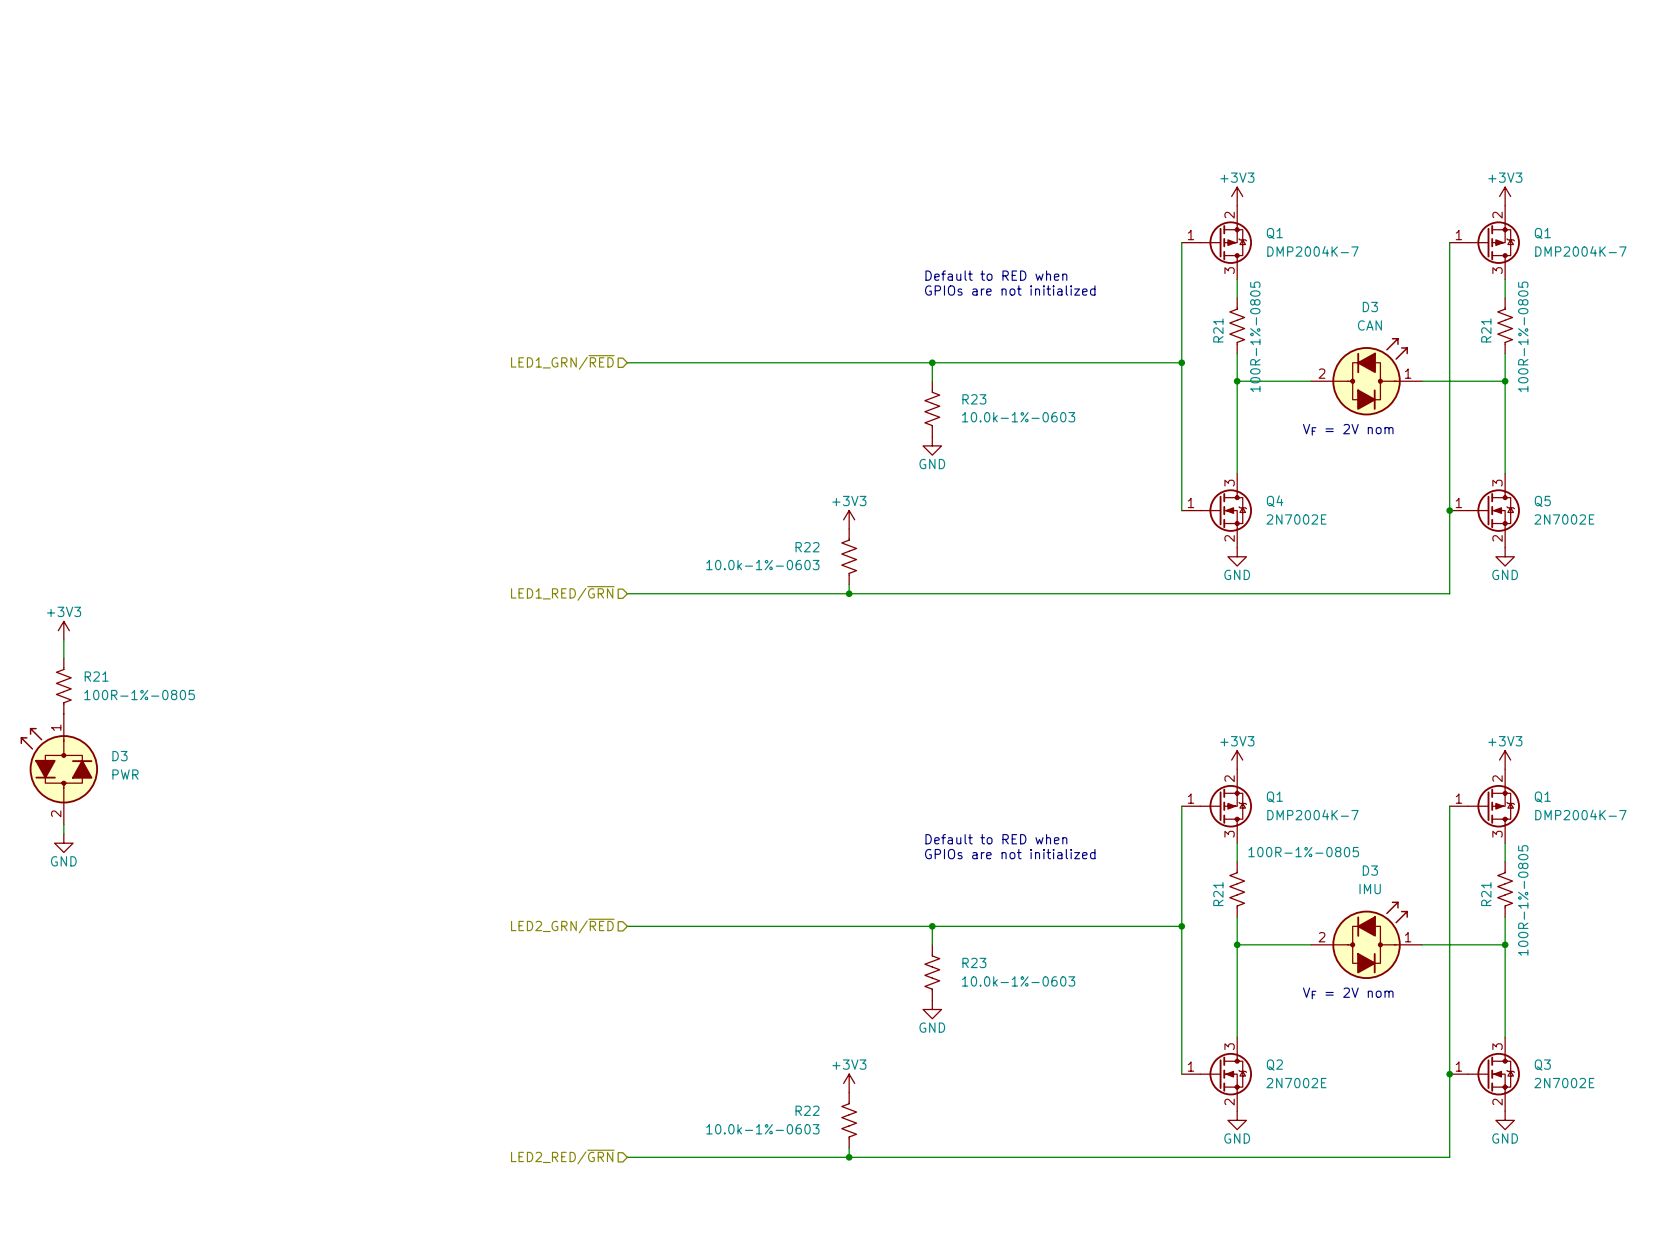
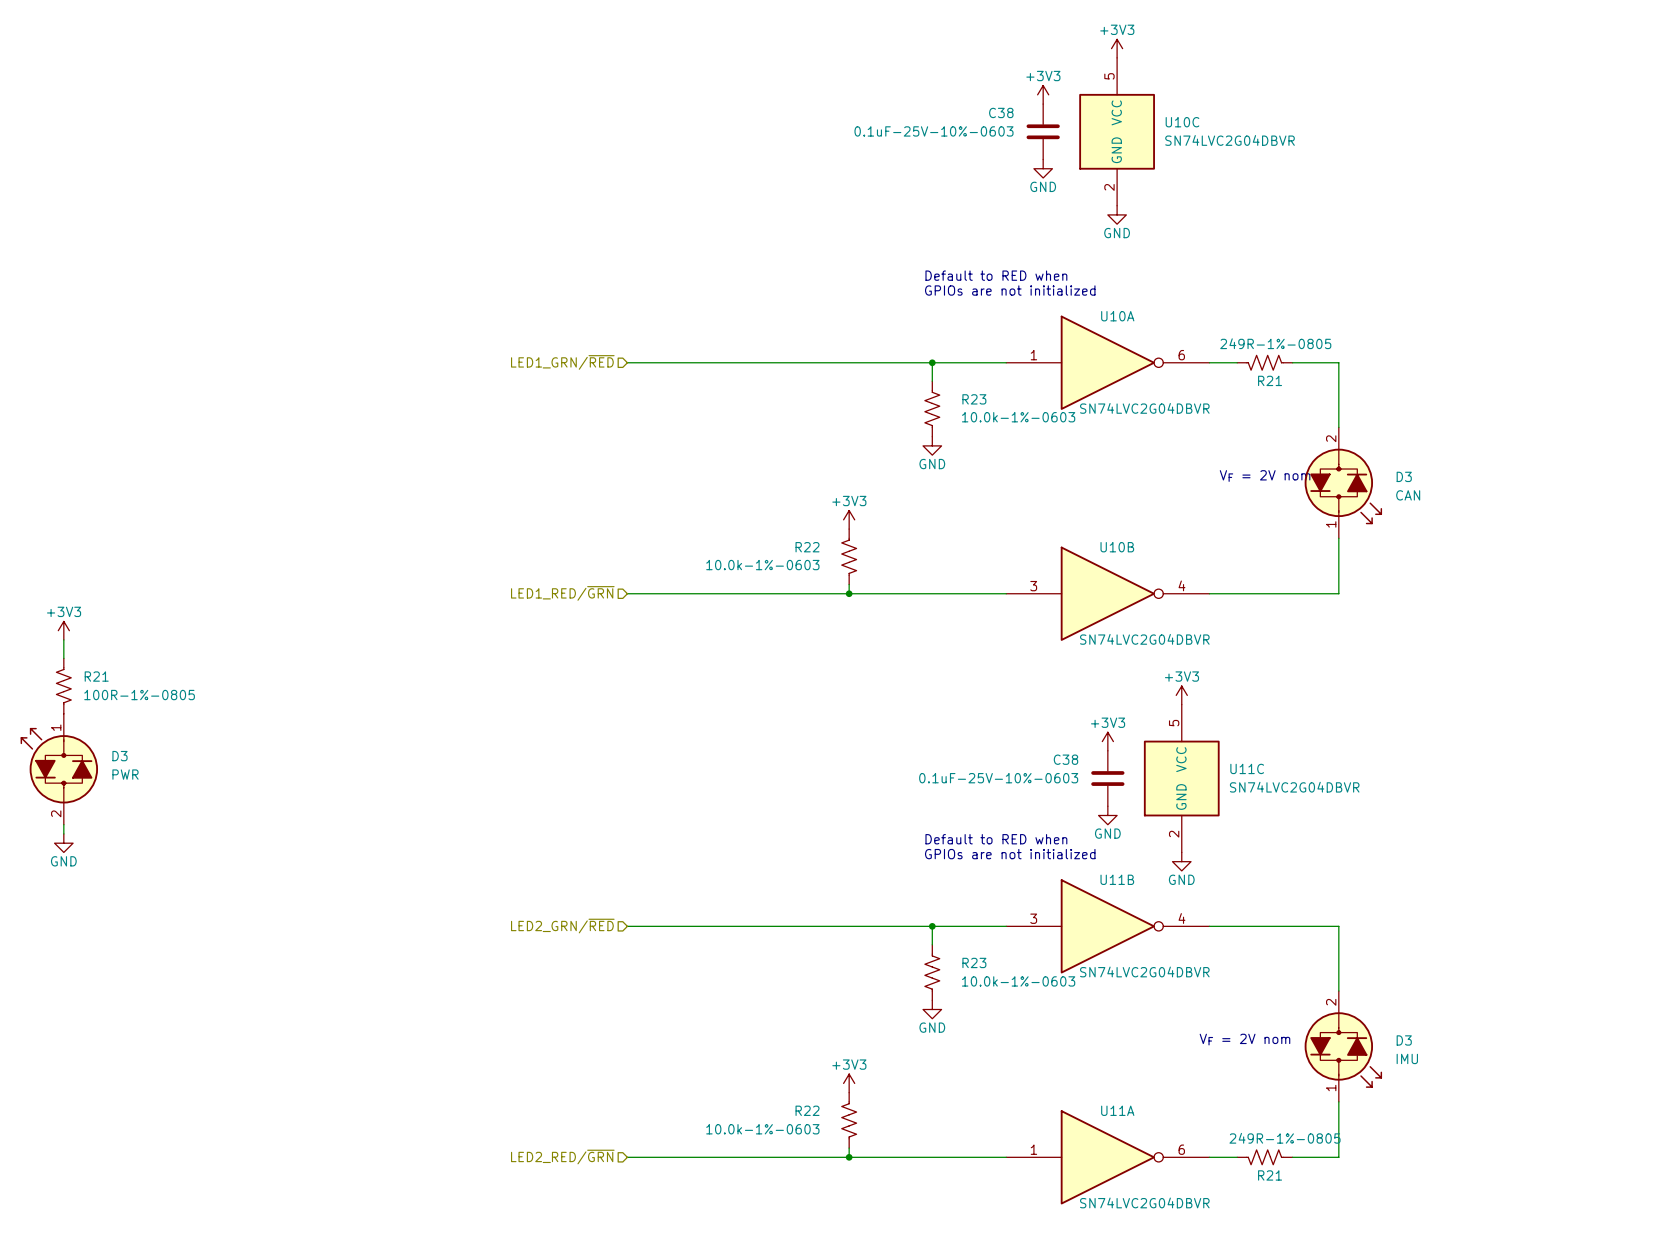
power symbol: none -> +3V3 (1117, 48)
power symbol: none -> +3V3 (1043, 94)
C38: none -> 0.1uF-25V-10%-0603 (1043, 131)
U10C: none -> SN74LVC2G04DBVR (1117, 131)
power symbol: none -> GND (1043, 168)
power symbol: +3V3 (1237, 196) -> none
power symbol: +3V3 (1505, 196) -> none
power symbol: none -> GND (1117, 214)
wire: (1181, 242) (1181, 510) -> none
Q1: DMP2004K-7 (1216, 242) -> none
wire: (1449, 242) (1449, 593) (1338, 593) -> (1338, 538) (1338, 593)
Q1: DMP2004K-7 (1484, 242) -> none
wire: (1237, 279) (1237, 298) -> none
wire: (1505, 279) (1505, 298) -> none
R21: 100R-1%-0805 (1237, 325) -> none
D3 value position: CAN (1369, 325) -> CAN (1408, 495)
R21: 100R-1%-0805 (1505, 325) -> none
wire: (1237, 353) (1237, 473) -> none
wire: (1505, 353) (1505, 473) -> none
U10A: none -> SN74LVC2G04DBVR (1107, 362)
junction: (1181, 362) -> none
wire: none -> (1209, 362) (1237, 362)
R21: none -> 249R-1%-0805 (1264, 362)
wire: none -> (1292, 362) (1338, 362) (1338, 427)
D3 position: (1366, 376) -> (1343, 482)
D3 rotation: 0° (1370, 376) -> 90° clockwise (1343, 486)
wire: (1237, 381) (1311, 381) -> none
junction: (1237, 381) -> none
wire: (1421, 381) (1505, 381) -> none
junction: (1505, 381) -> none
text position: VF = 2V nom (1348, 429) -> VF = 2V nom (1265, 475)
Q4: 2N7002E (1216, 510) -> none
junction: (1449, 510) -> none
Q5: 2N7002E (1484, 510) -> none
power symbol: GND (1237, 556) -> none
power symbol: GND (1505, 556) -> none
U10B: none -> SN74LVC2G04DBVR (1107, 593)
power symbol: none -> +3V3 (1181, 695)
power symbol: none -> +3V3 (1107, 741)
power symbol: +3V3 (1237, 760) -> none
power symbol: +3V3 (1505, 760) -> none
C38: none -> 0.1uF-25V-10%-0603 (1107, 778)
U11C: none -> SN74LVC2G04DBVR (1181, 778)
wire: (1181, 806) (1181, 1074) -> none
Q1: DMP2004K-7 (1216, 806) -> none
wire: (1449, 806) (1449, 1157) (1338, 1157) -> (1338, 1101) (1338, 1157)
Q1: DMP2004K-7 (1484, 806) -> none
power symbol: none -> GND (1107, 815)
wire: (1237, 843) (1237, 861) -> none
wire: (1505, 843) (1505, 861) -> none
power symbol: none -> GND (1181, 861)
R21: 100R-1%-0805 (1237, 889) -> none
D3 value position: IMU (1370, 889) -> IMU (1407, 1058)
R21: 100R-1%-0805 (1505, 889) -> none
wire: (1237, 917) (1237, 1037) -> none
wire: (1505, 917) (1505, 1037) -> none
U11B: none -> SN74LVC2G04DBVR (1107, 926)
junction: (1181, 926) -> none
wire: none -> (1209, 926) (1338, 926) (1338, 991)
D3 position: (1366, 940) -> (1343, 1046)
D3 rotation: 0° (1370, 940) -> 90° clockwise (1343, 1050)
wire: (1237, 944) (1311, 944) -> none
junction: (1237, 944) -> none
wire: (1421, 944) (1505, 944) -> none
junction: (1505, 944) -> none
text position: VF = 2V nom (1348, 993) -> VF = 2V nom (1244, 1039)
Q2: 2N7002E (1216, 1074) -> none
junction: (1449, 1074) -> none
Q3: 2N7002E (1484, 1074) -> none
power symbol: GND (1237, 1120) -> none
power symbol: GND (1505, 1120) -> none
U11A: none -> SN74LVC2G04DBVR (1107, 1157)
R21: none -> 249R-1%-0805 (1264, 1157)

